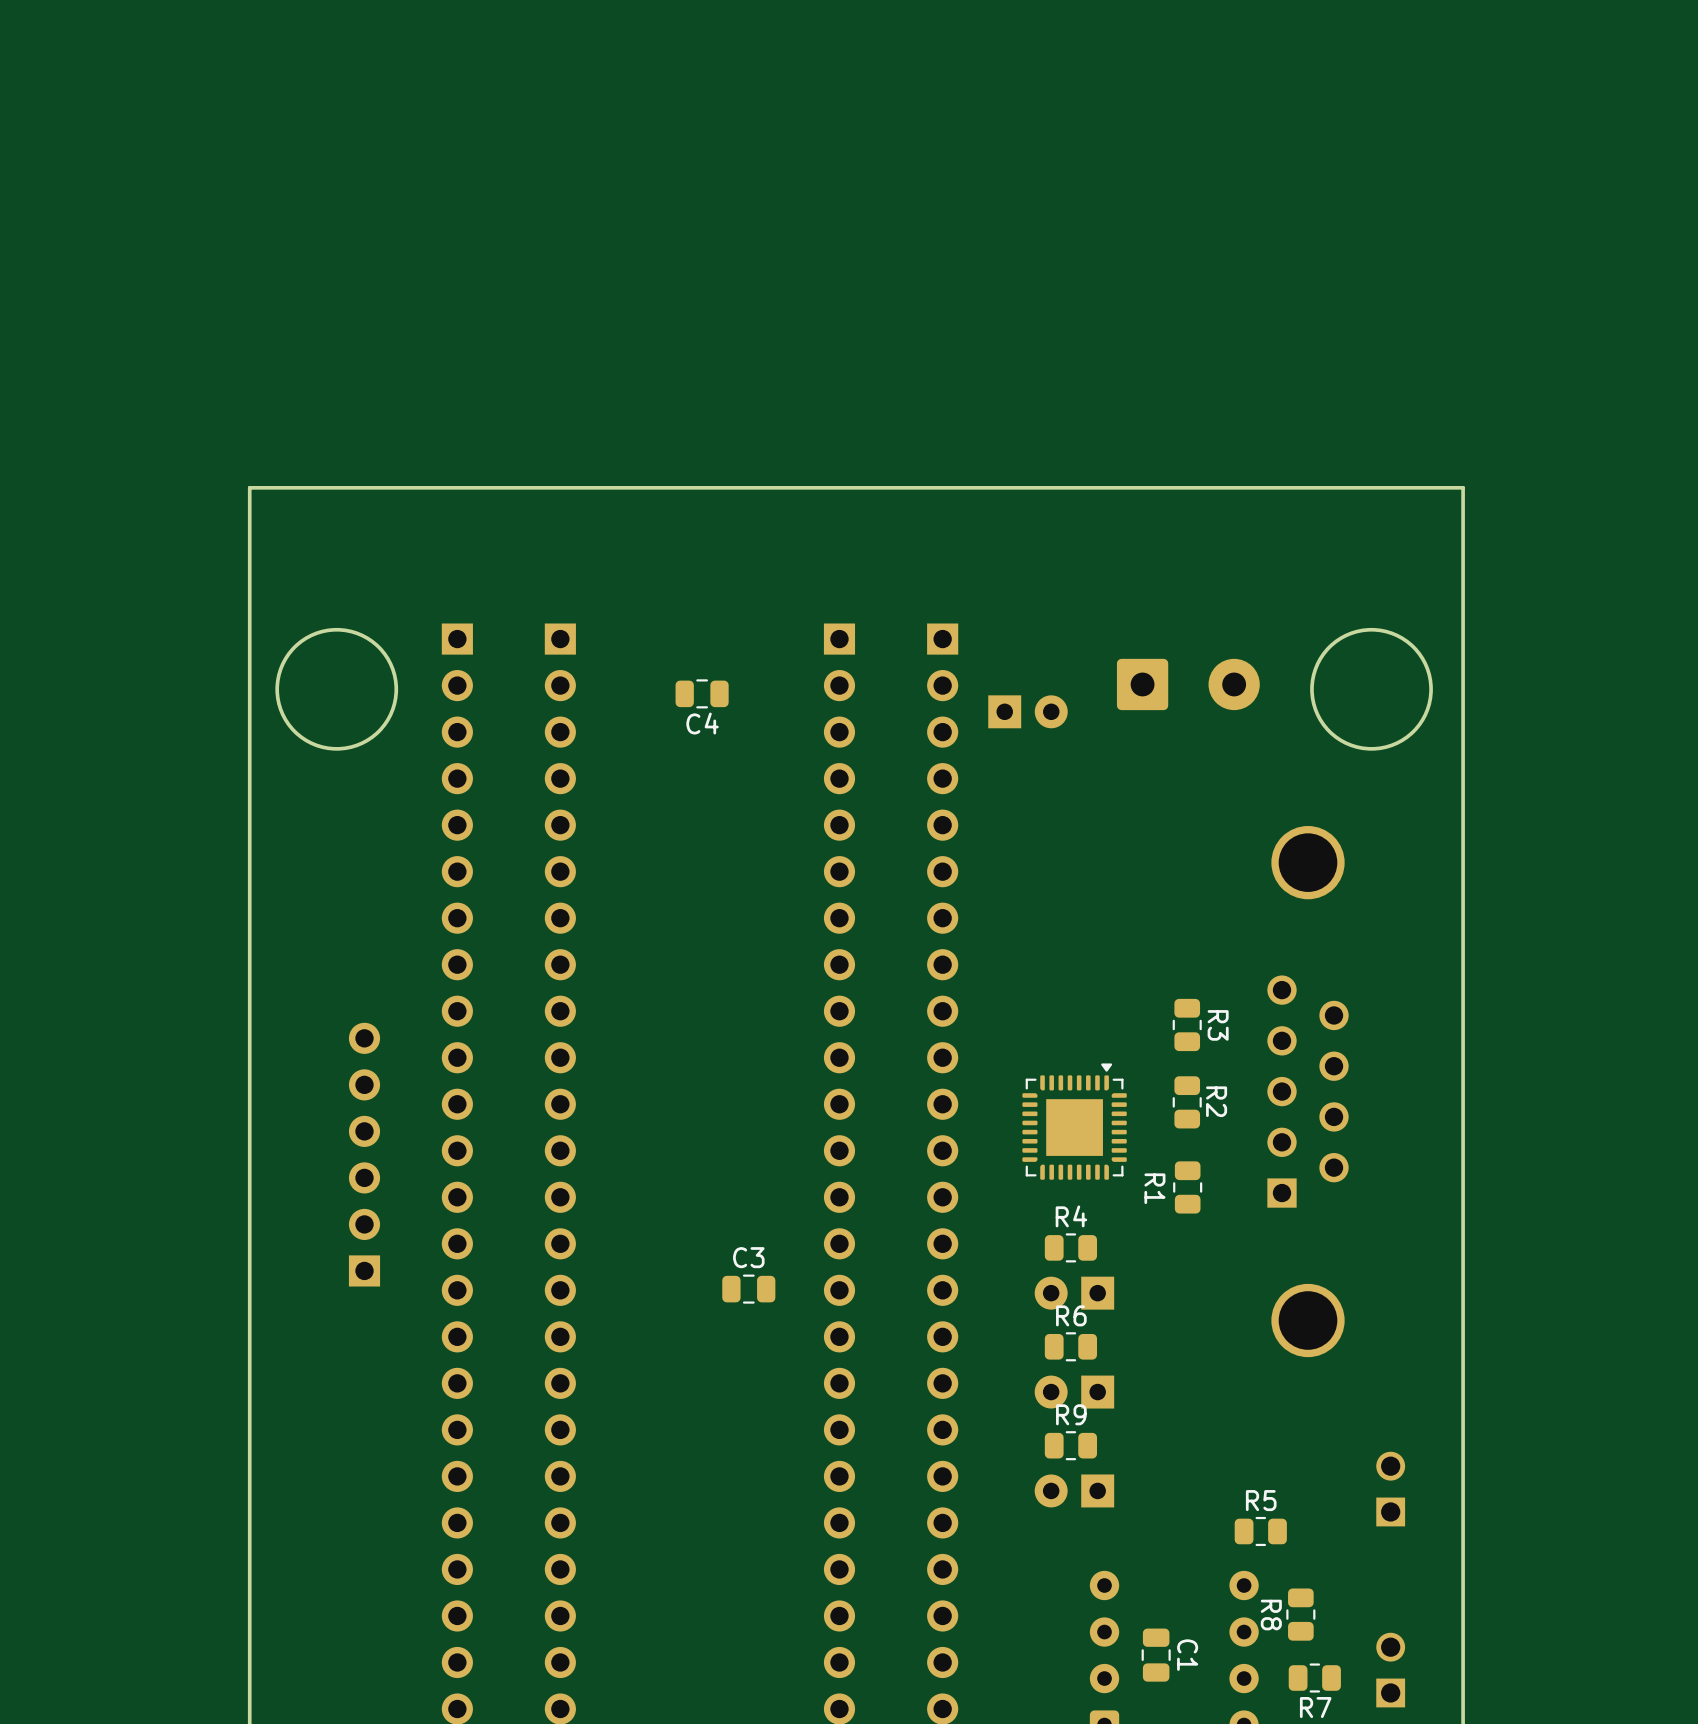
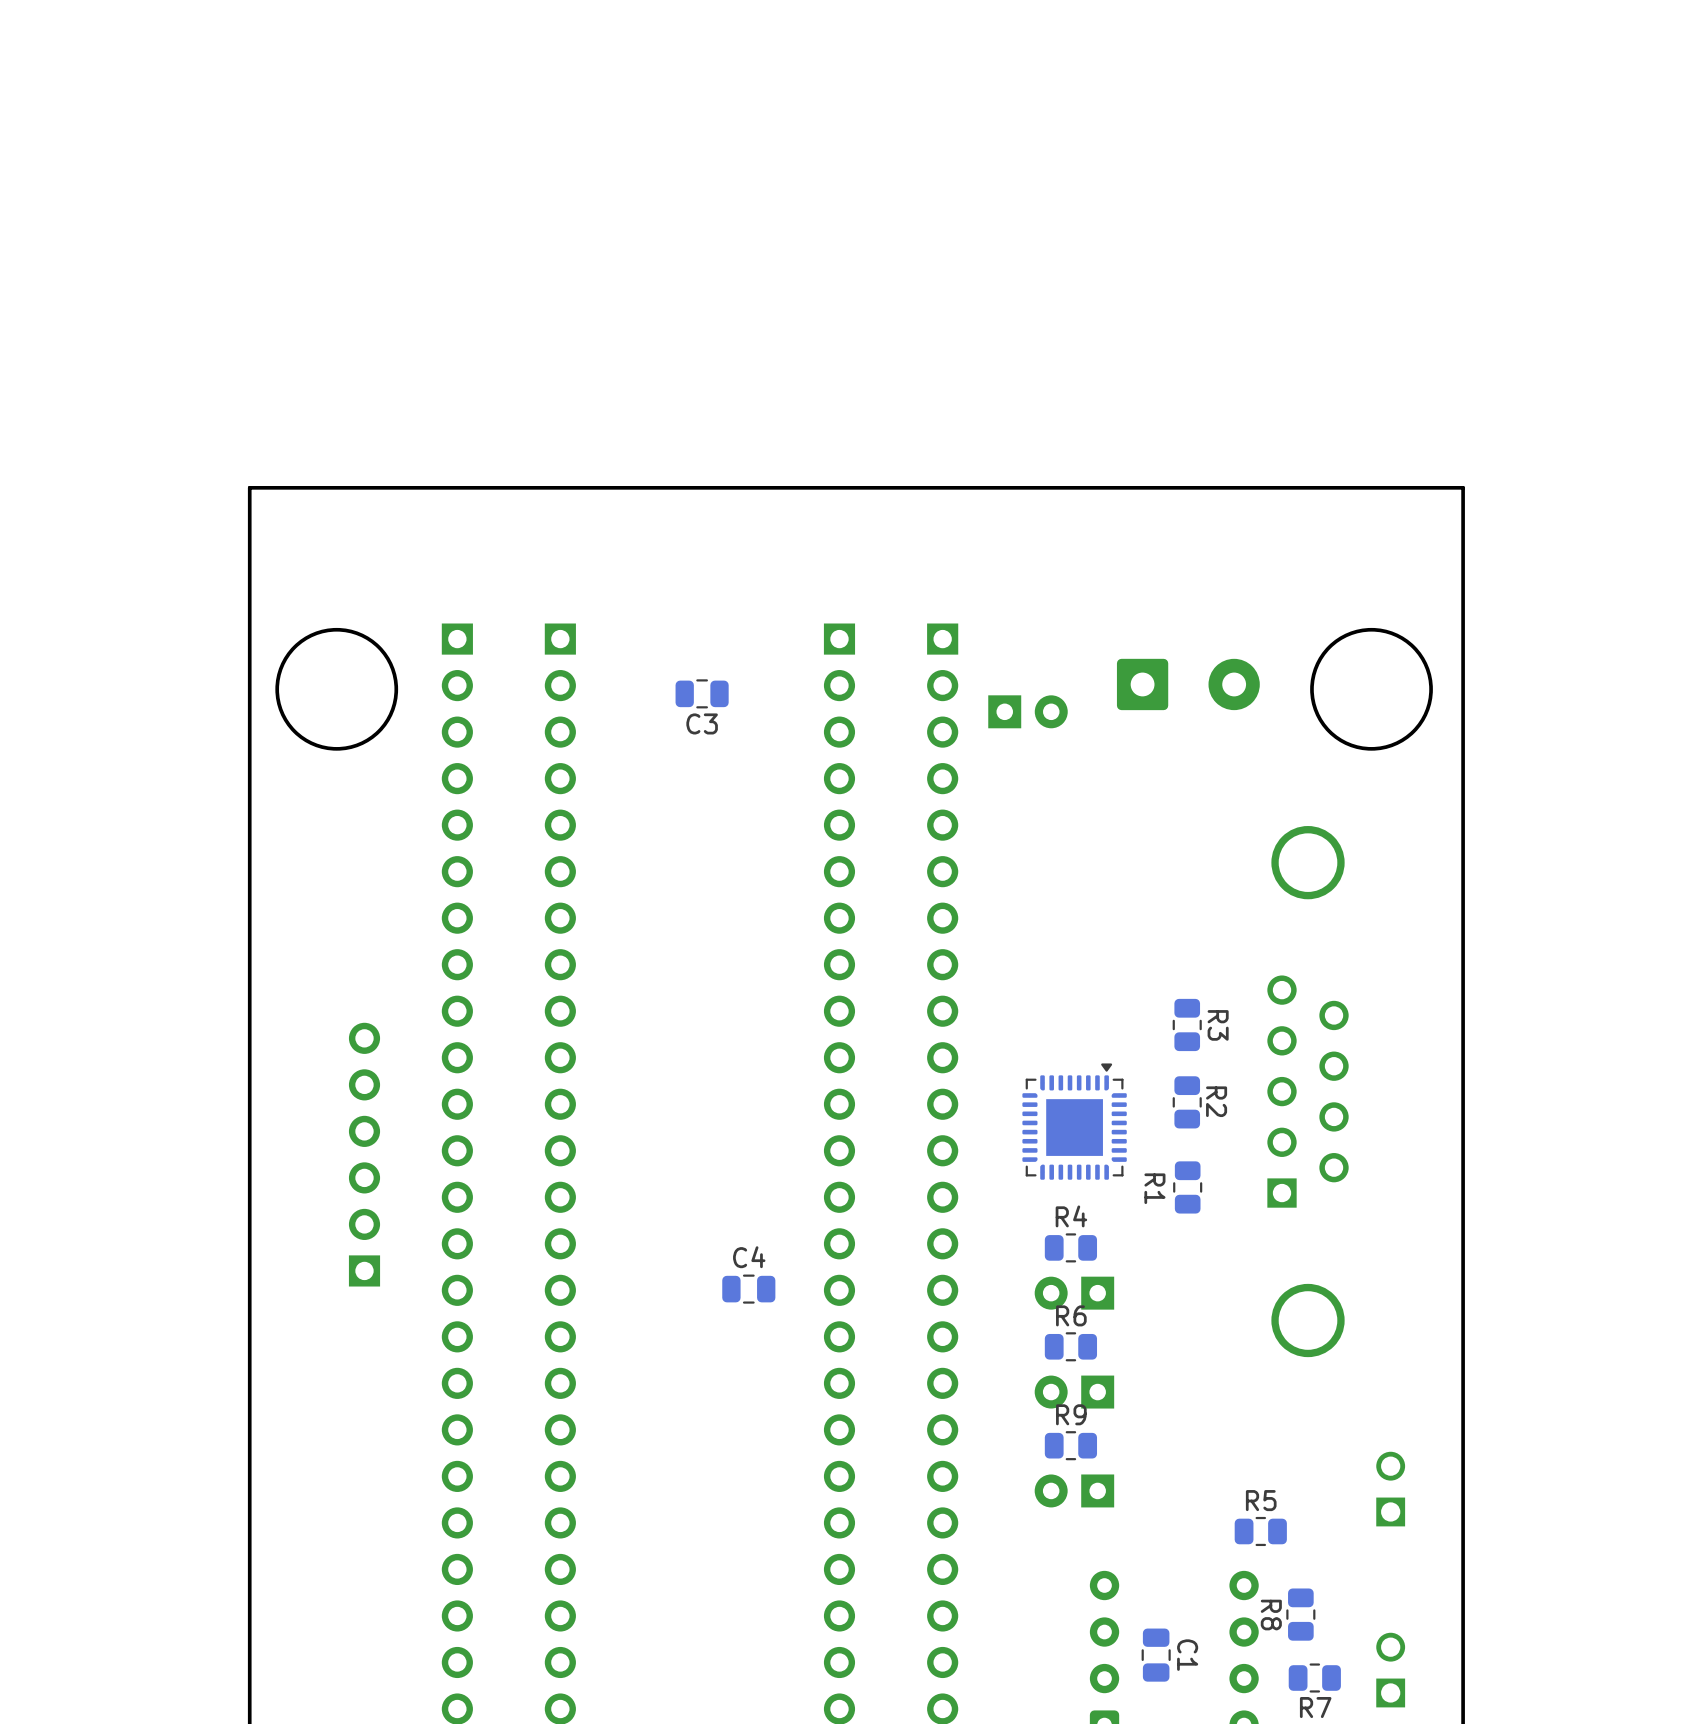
C4 name: C4 (702, 723) -> C3 (702, 723)
C3 name: C3 (748, 1257) -> C4 (749, 1257)

